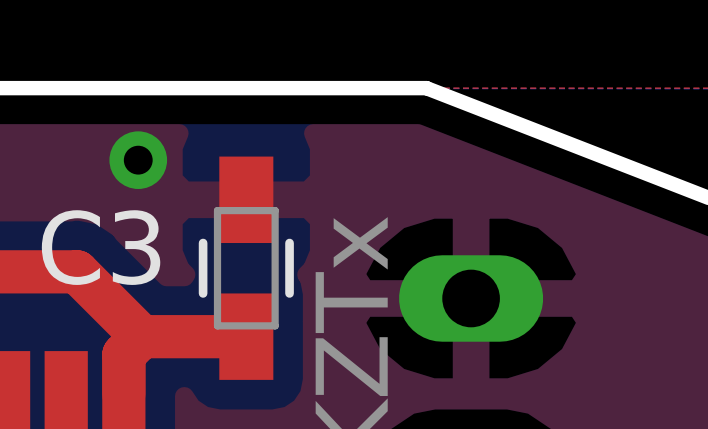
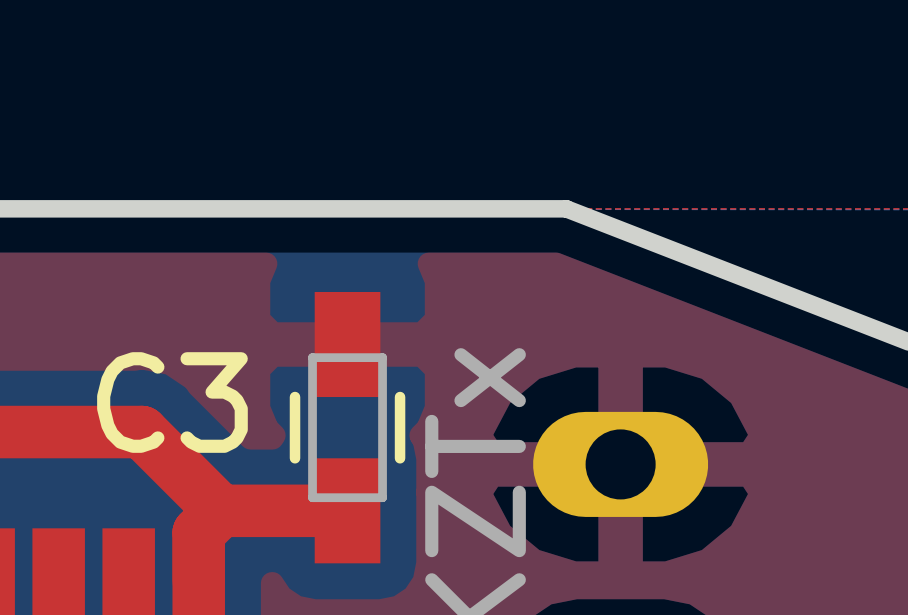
via: (138, 160) -> none

